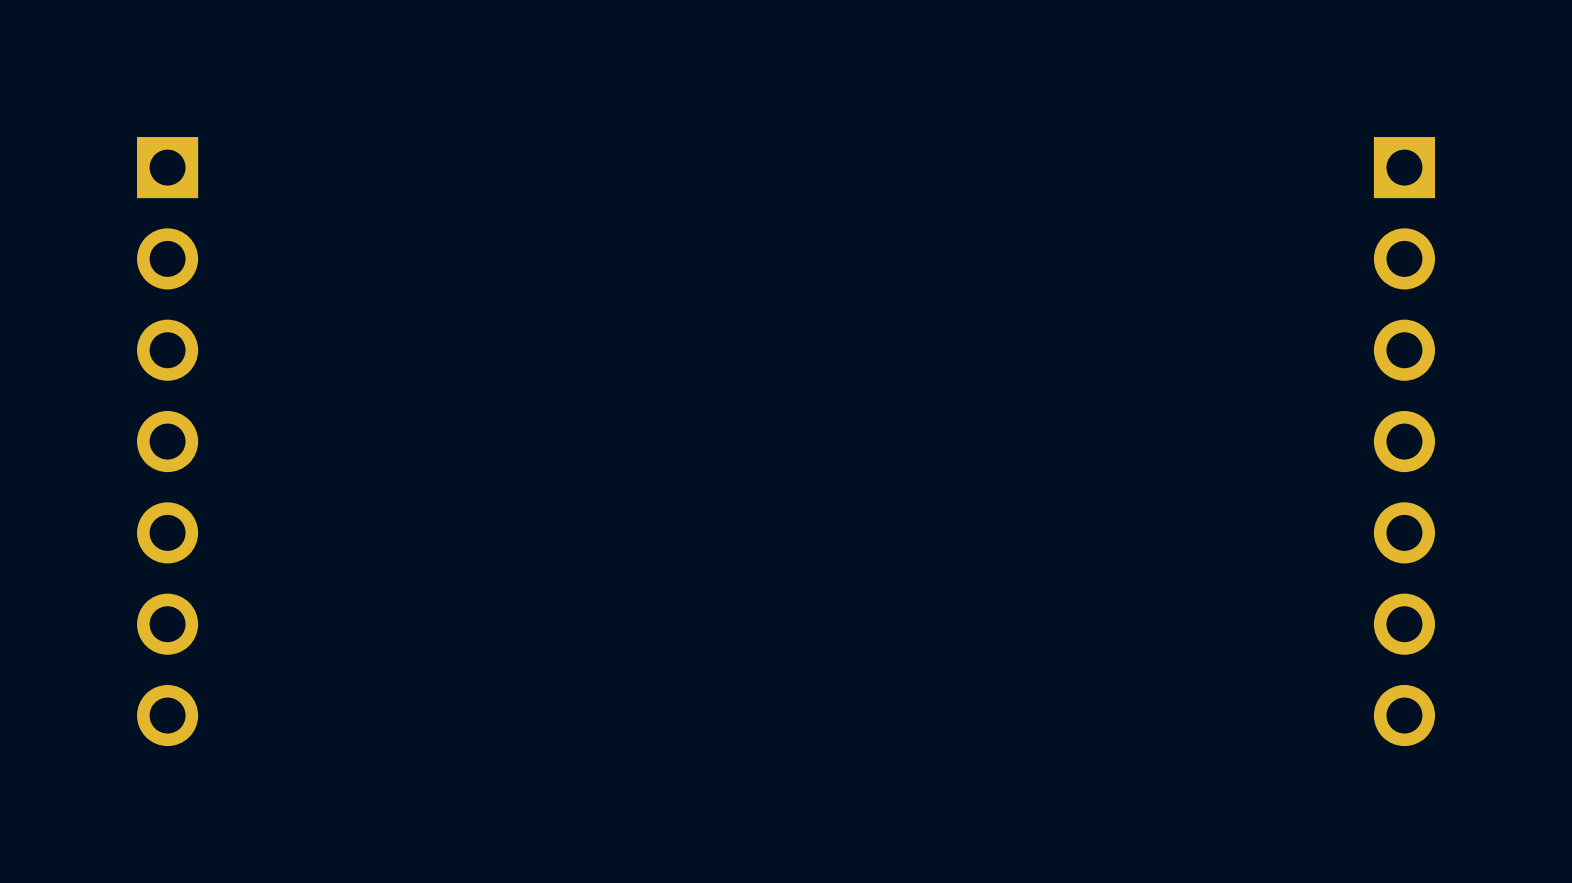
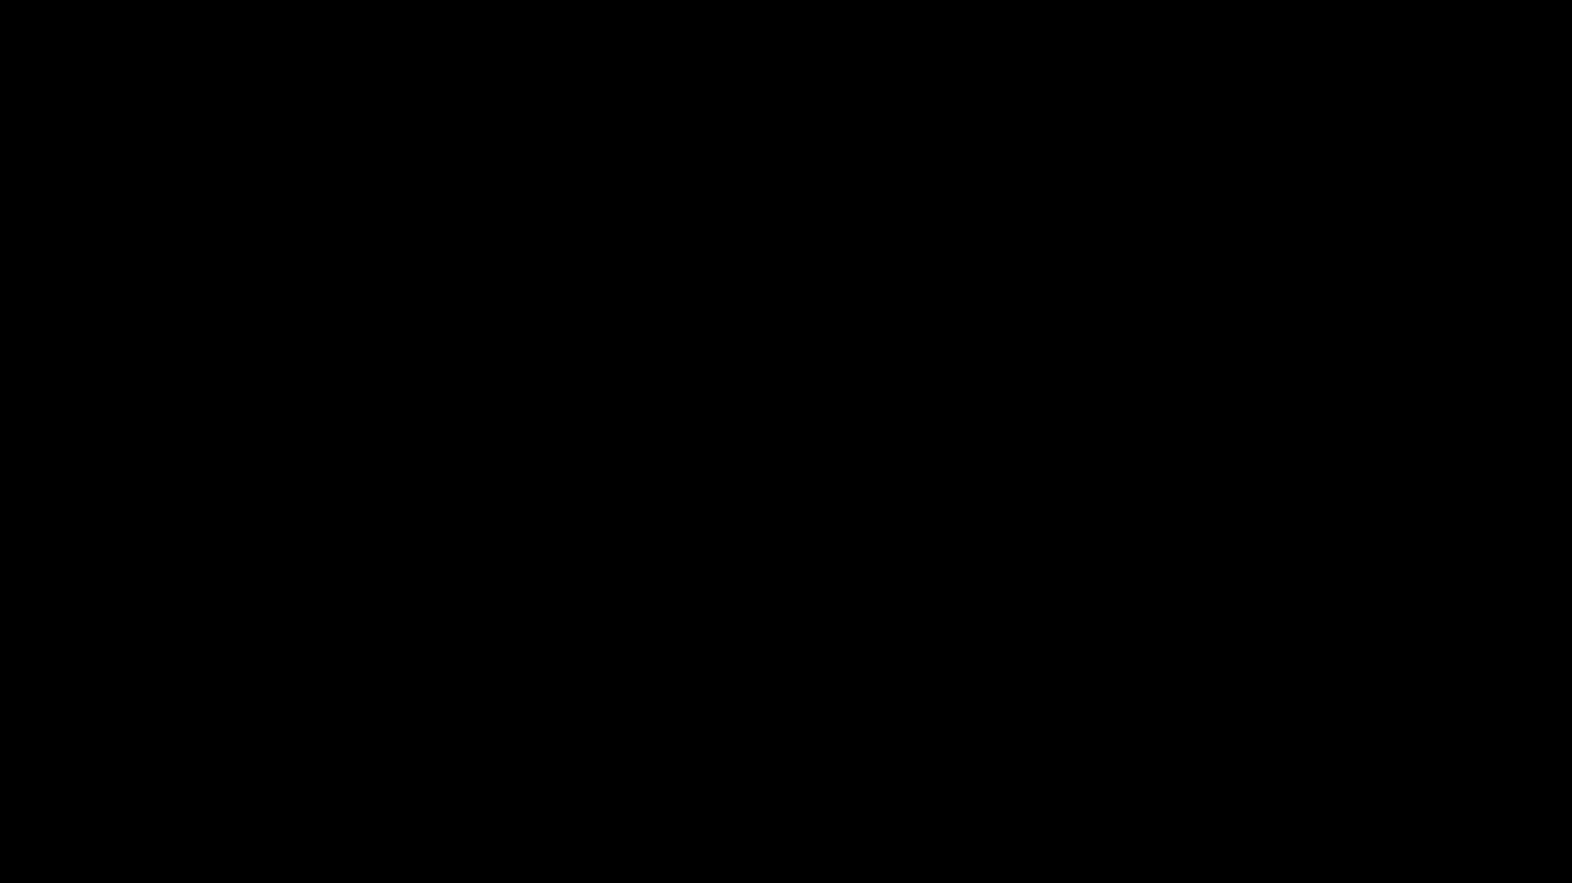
part: (167, 441) -> none
part: (1404, 441) -> none

